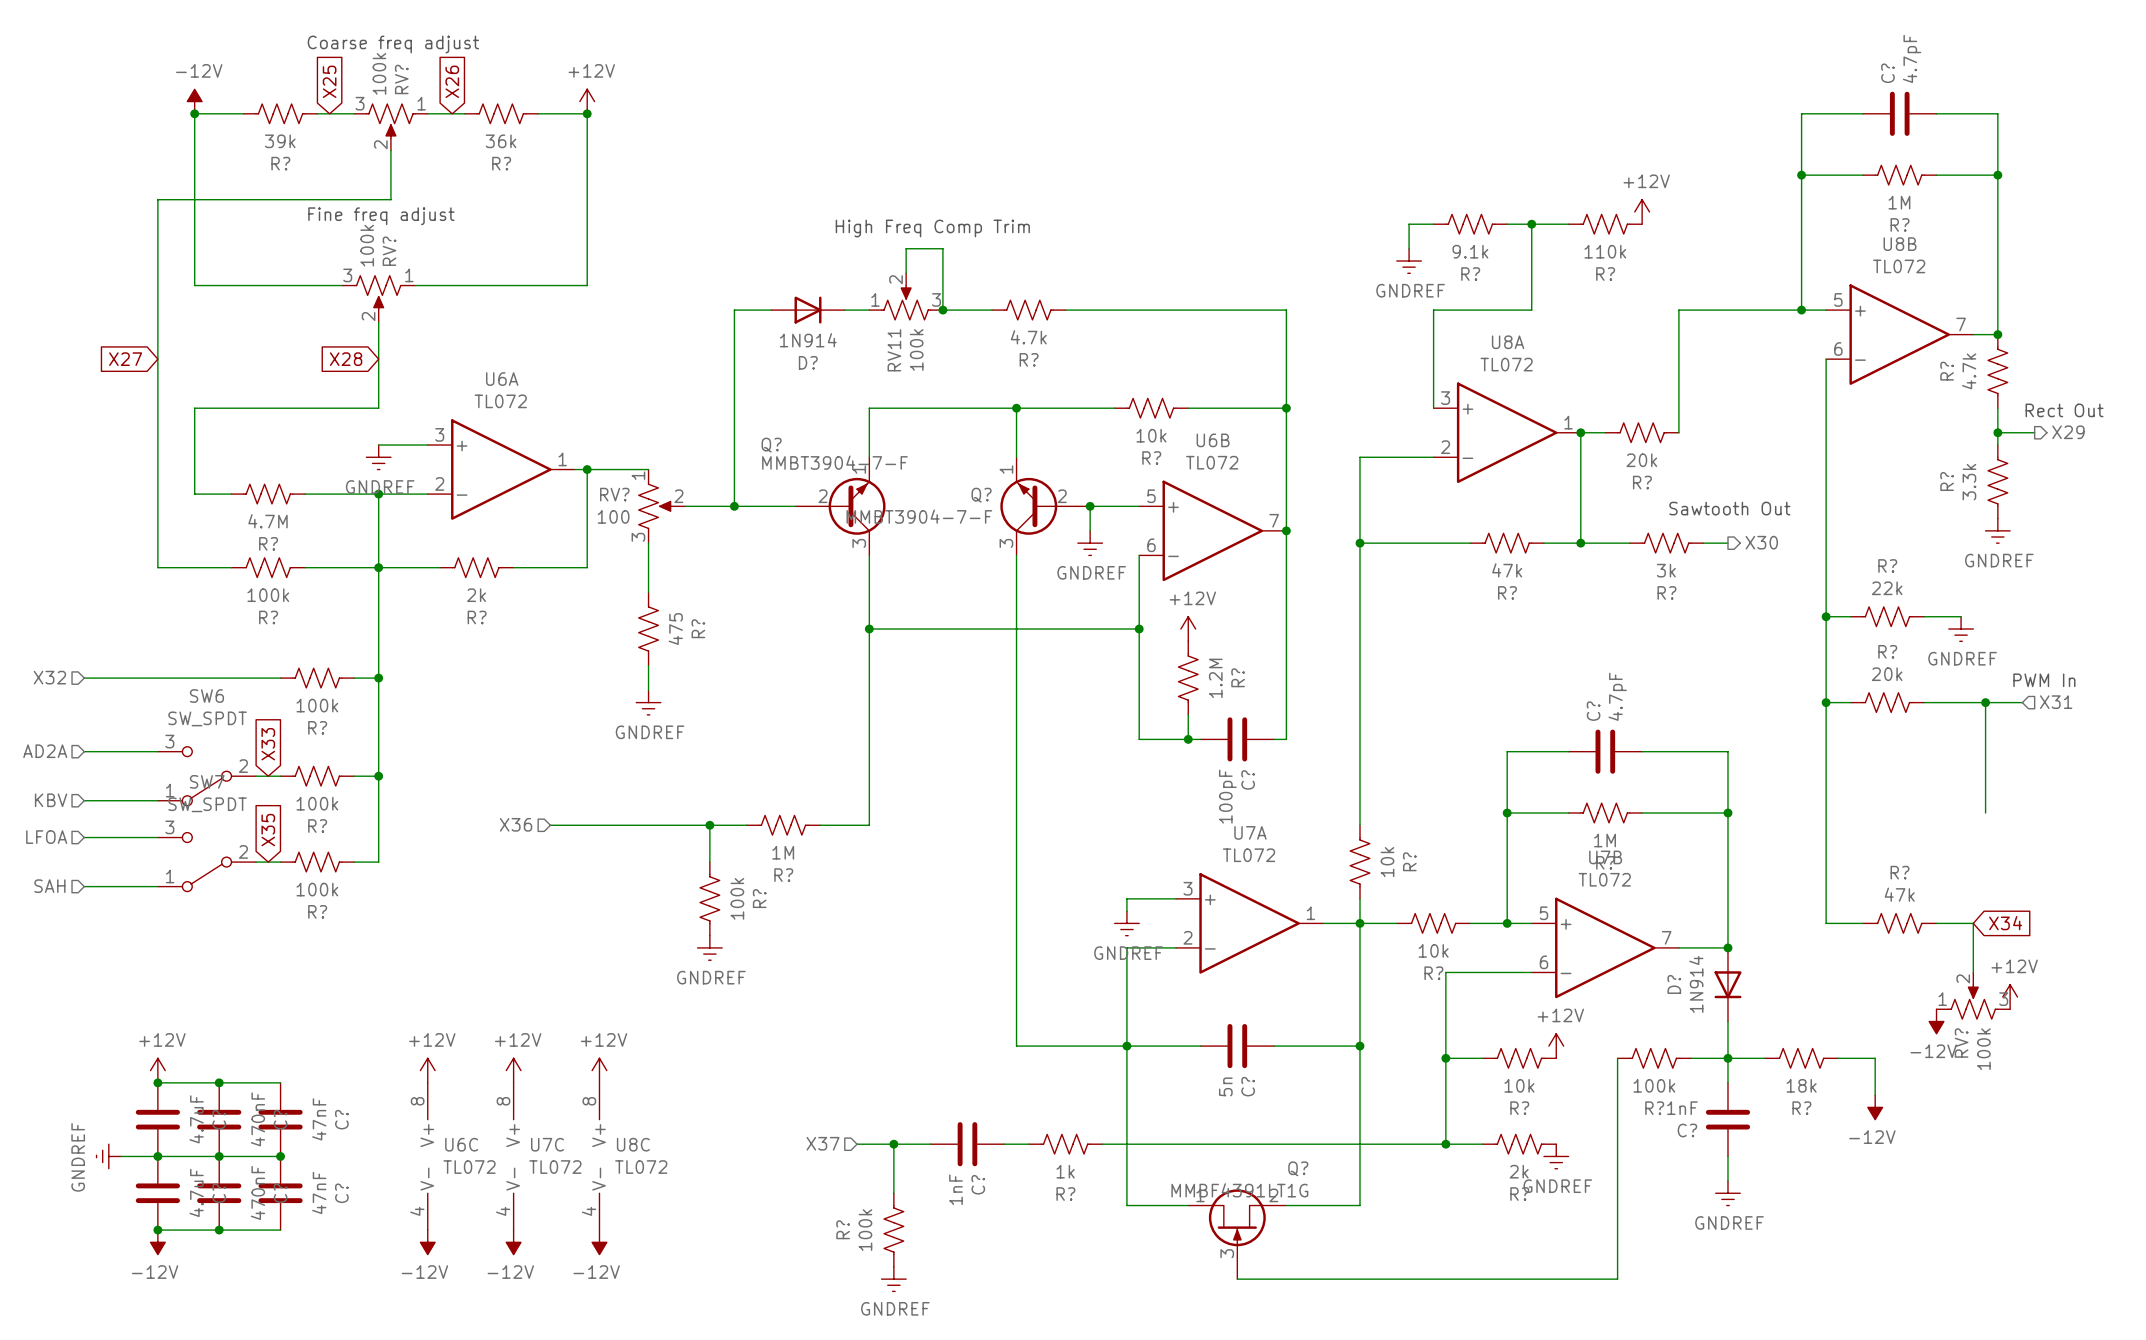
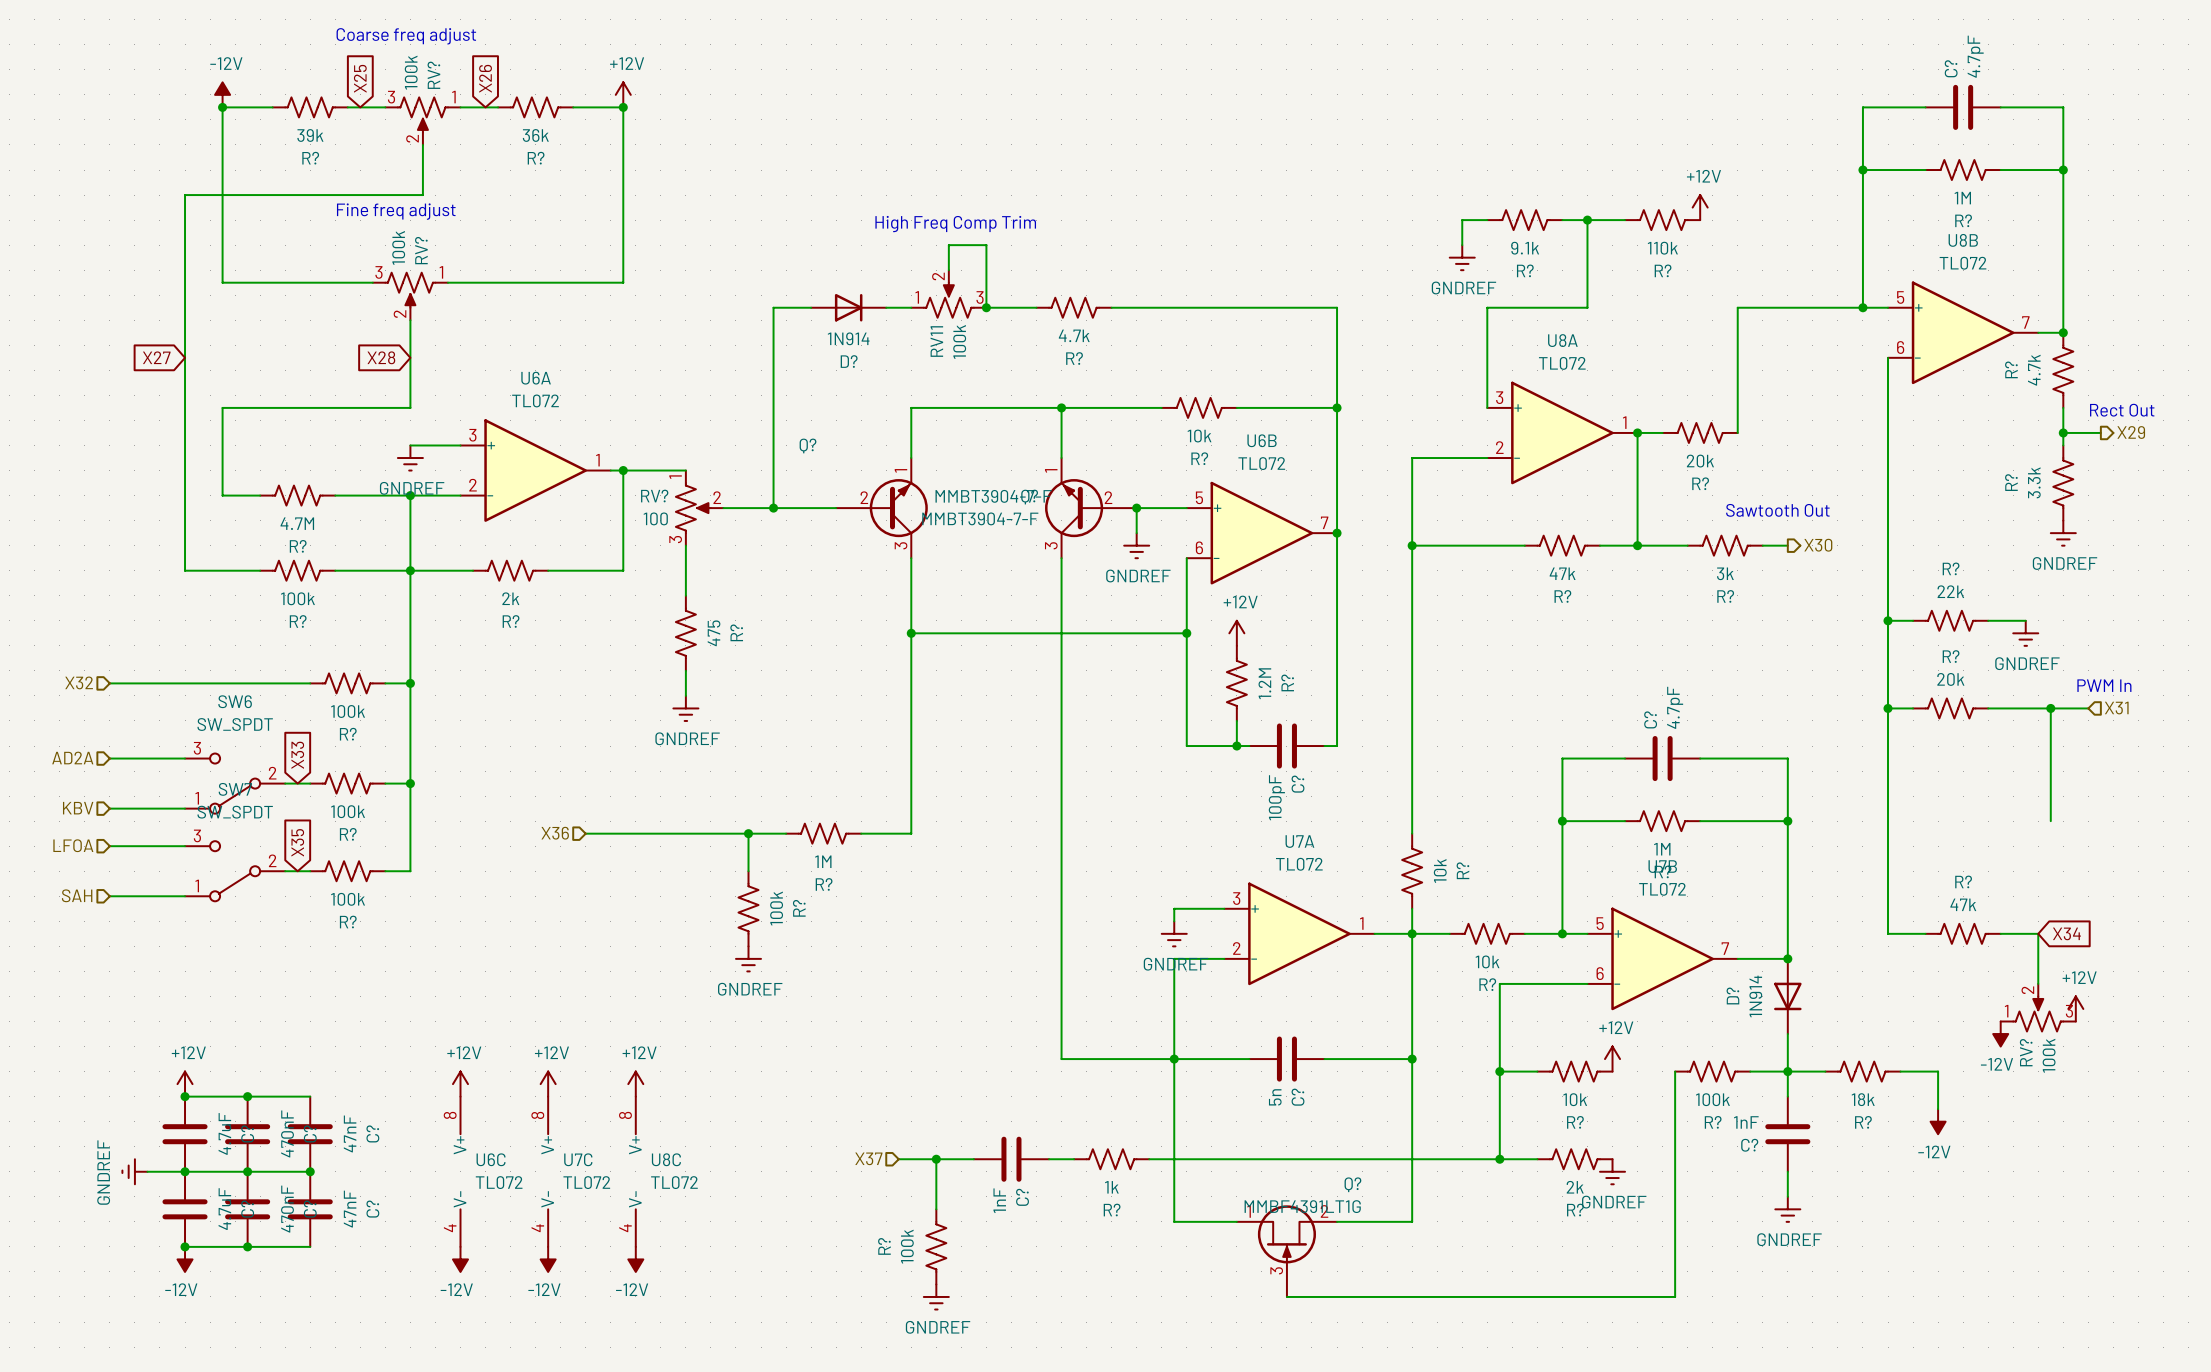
Q? value position: MMBT3904-7-F (834, 462) -> MMBT3904-7-F (993, 496)

